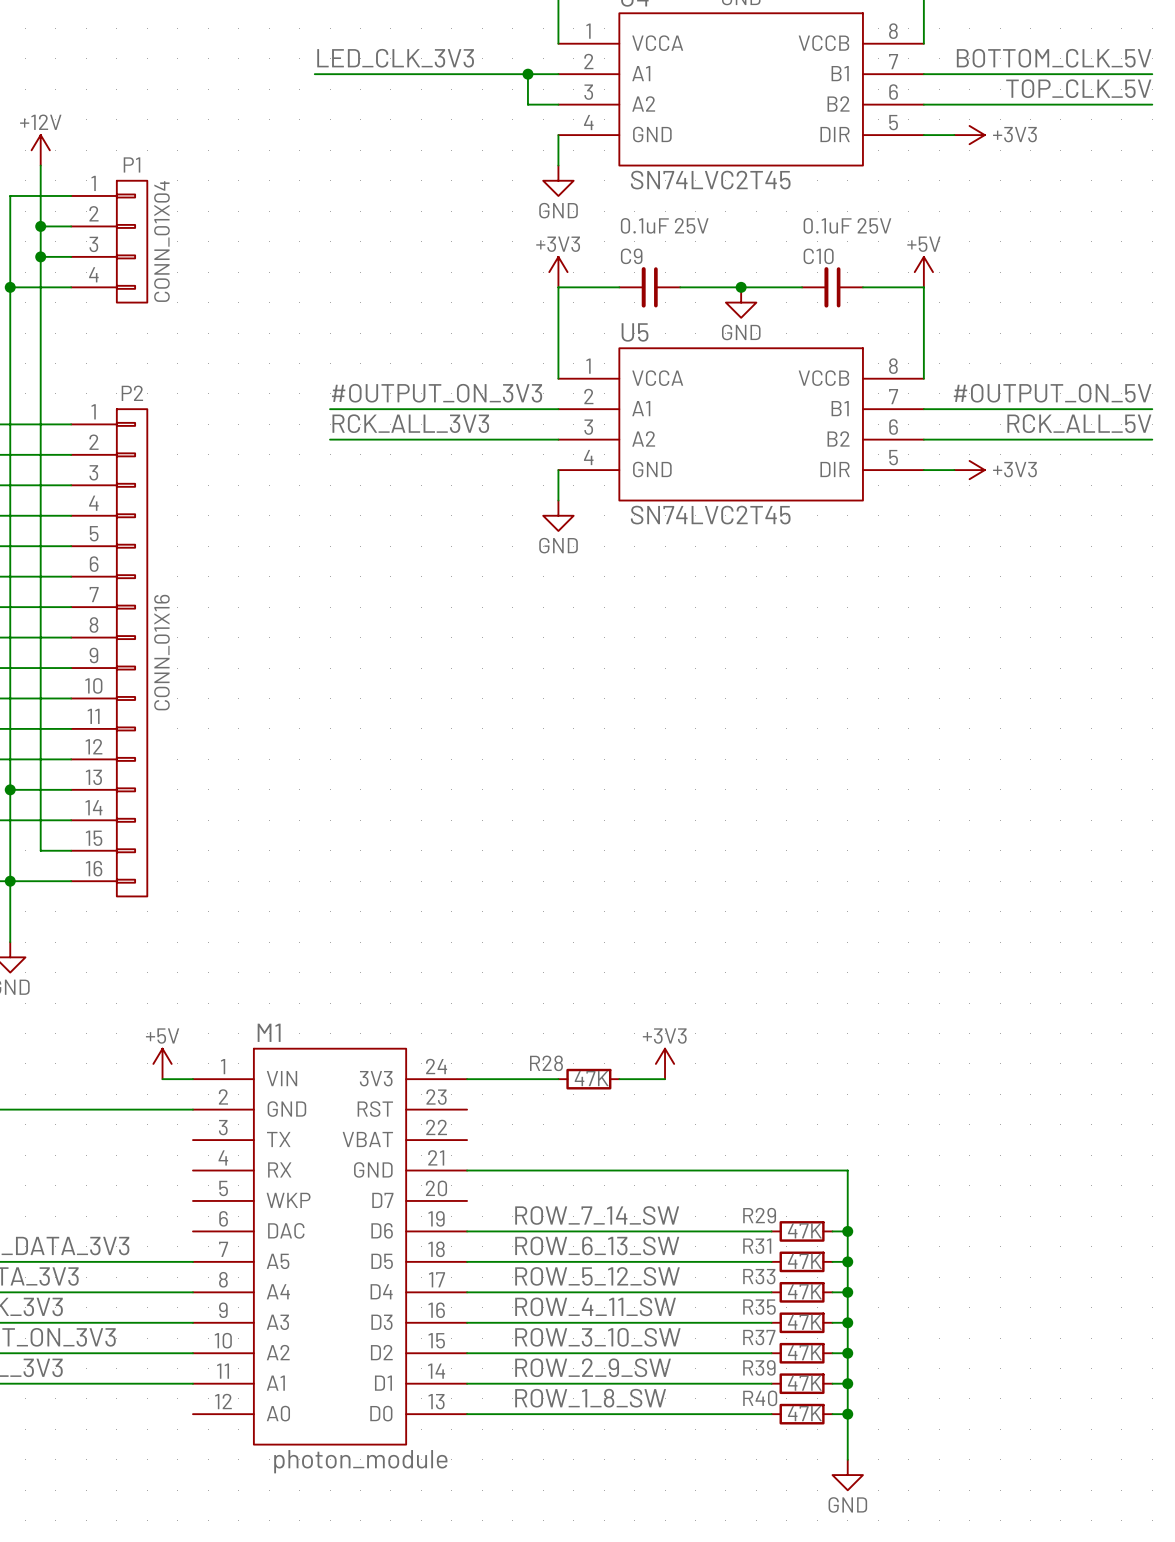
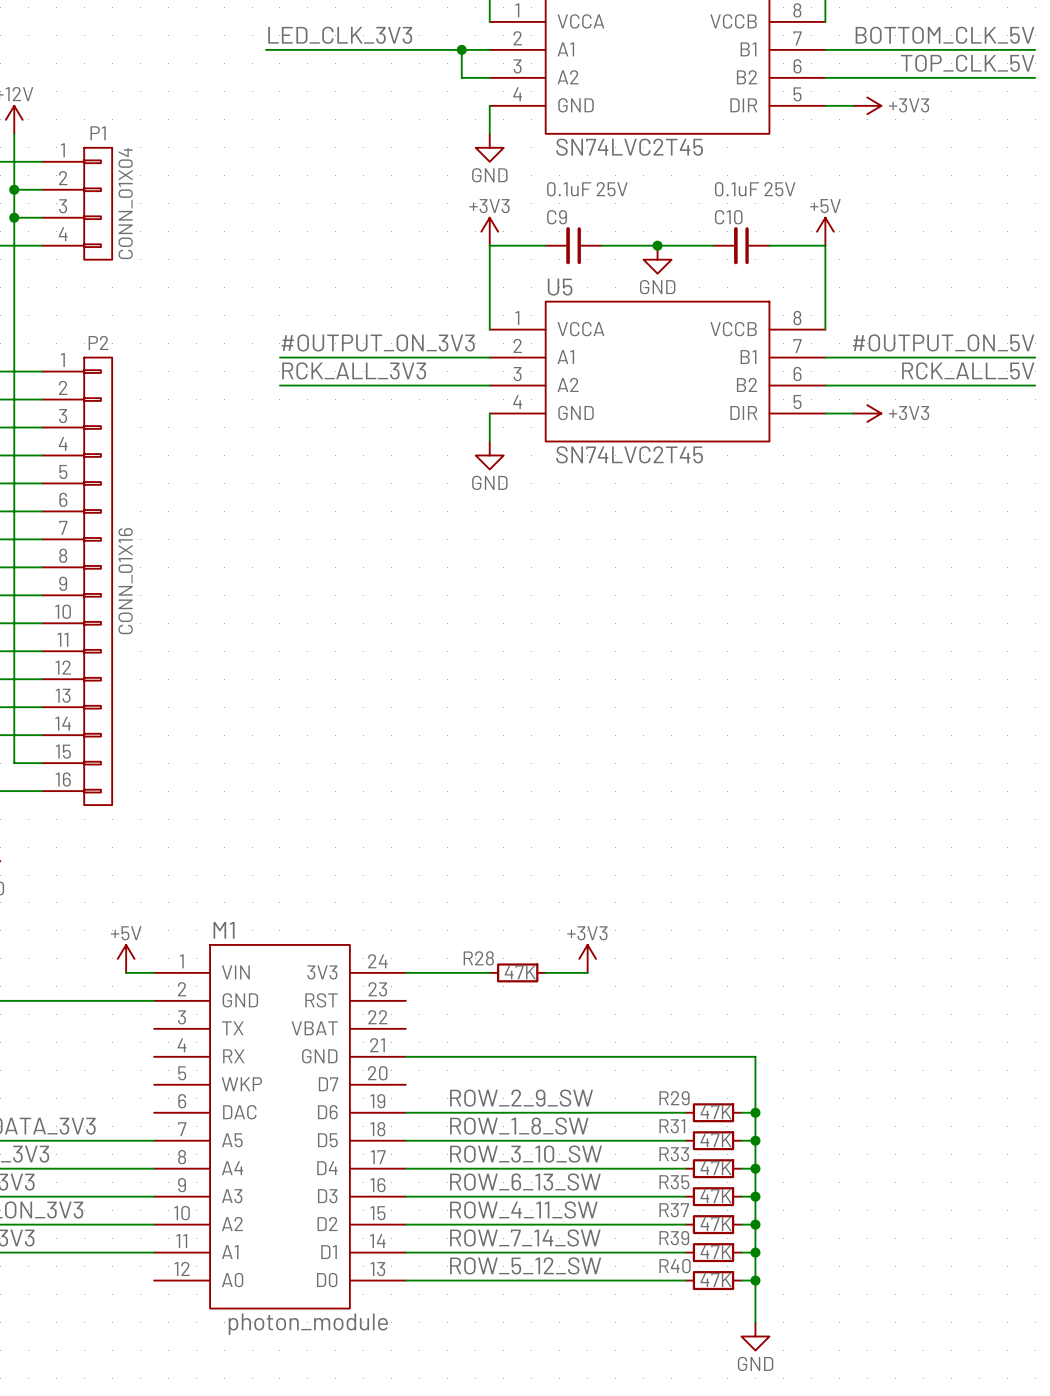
label: ROW_7_14_SW (597, 1215) -> ROW_2_9_SW (521, 1098)
label: ROW_6_13_SW (597, 1245) -> ROW_1_8_SW (519, 1126)
label: ROW_5_12_SW (597, 1276) -> ROW_3_10_SW (525, 1154)
label: ROW_4_11_SW (595, 1306) -> ROW_6_13_SW (525, 1182)
label: ROW_3_10_SW (597, 1337) -> ROW_4_11_SW (523, 1209)
label: ROW_2_9_SW (593, 1367) -> ROW_7_14_SW (525, 1237)
label: ROW_1_8_SW (590, 1398) -> ROW_5_12_SW (525, 1265)

